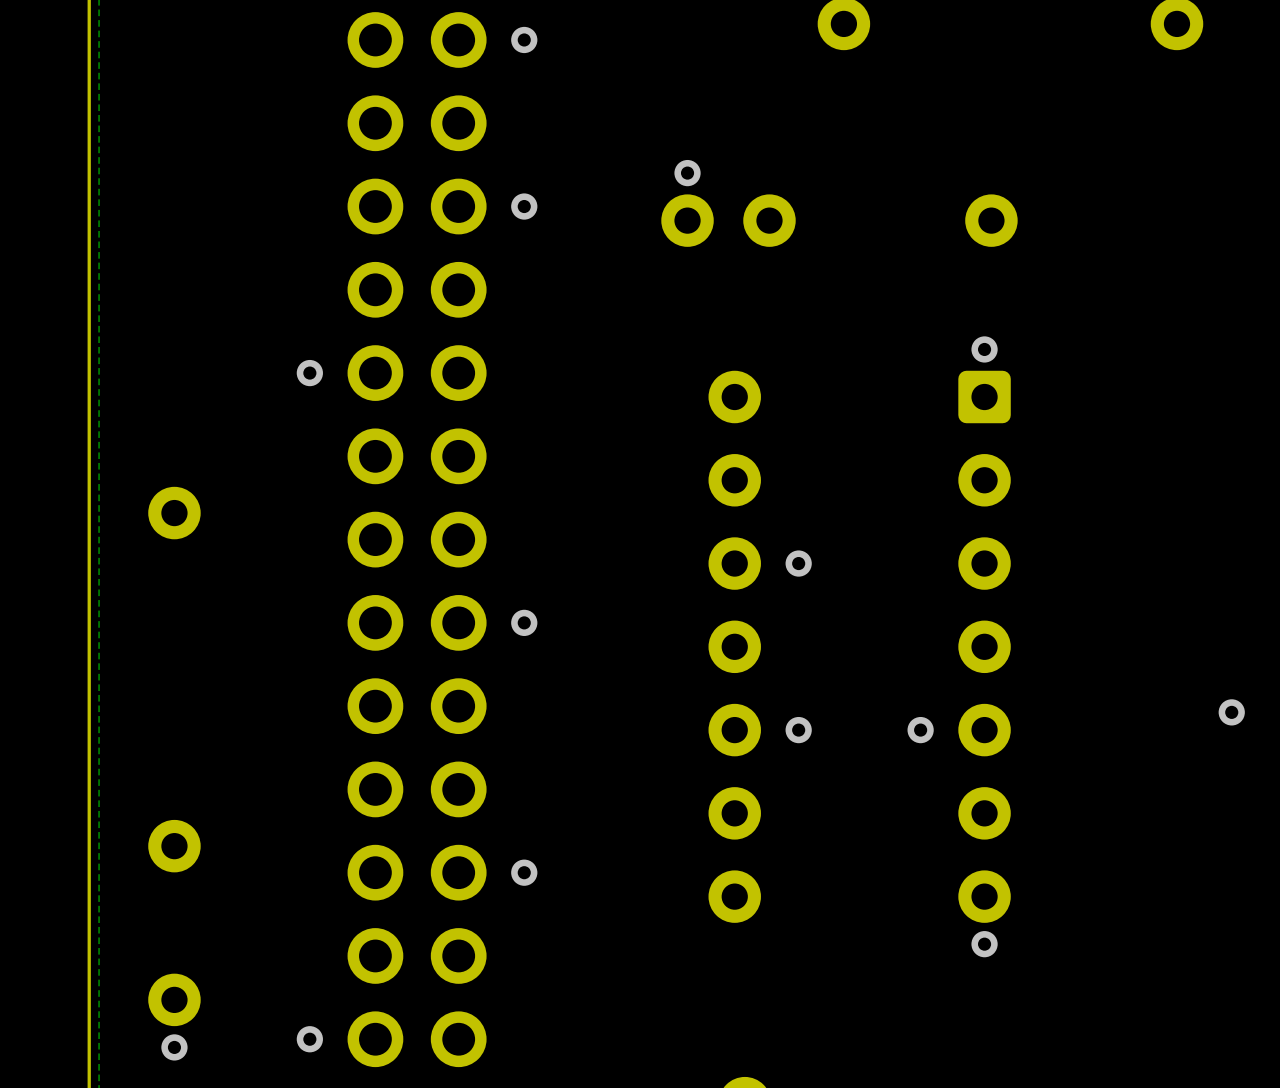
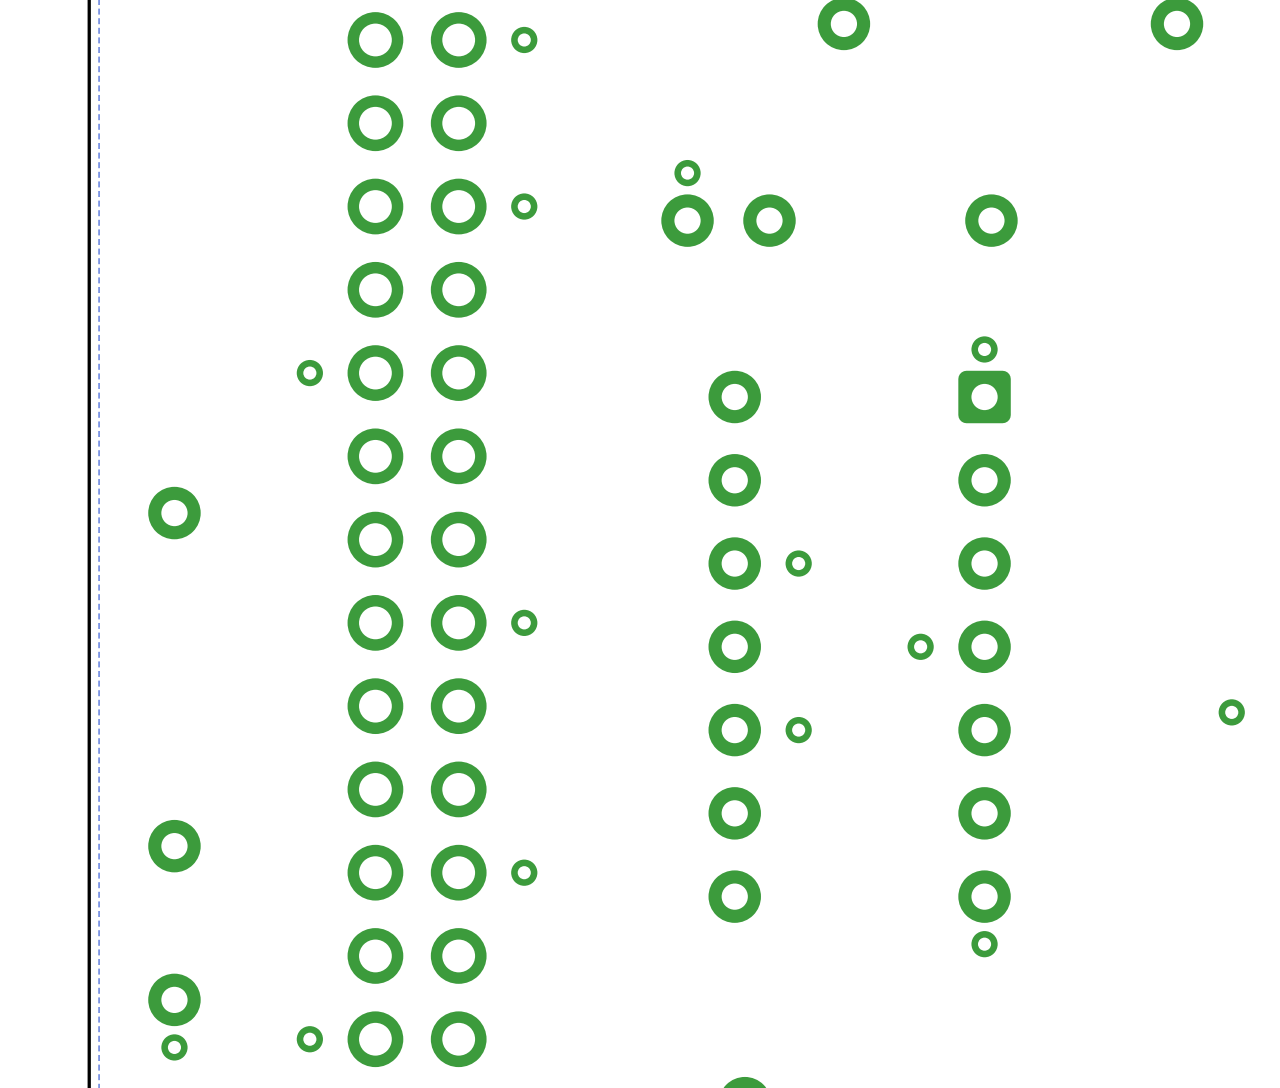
via position: (920, 730) -> (920, 646)

